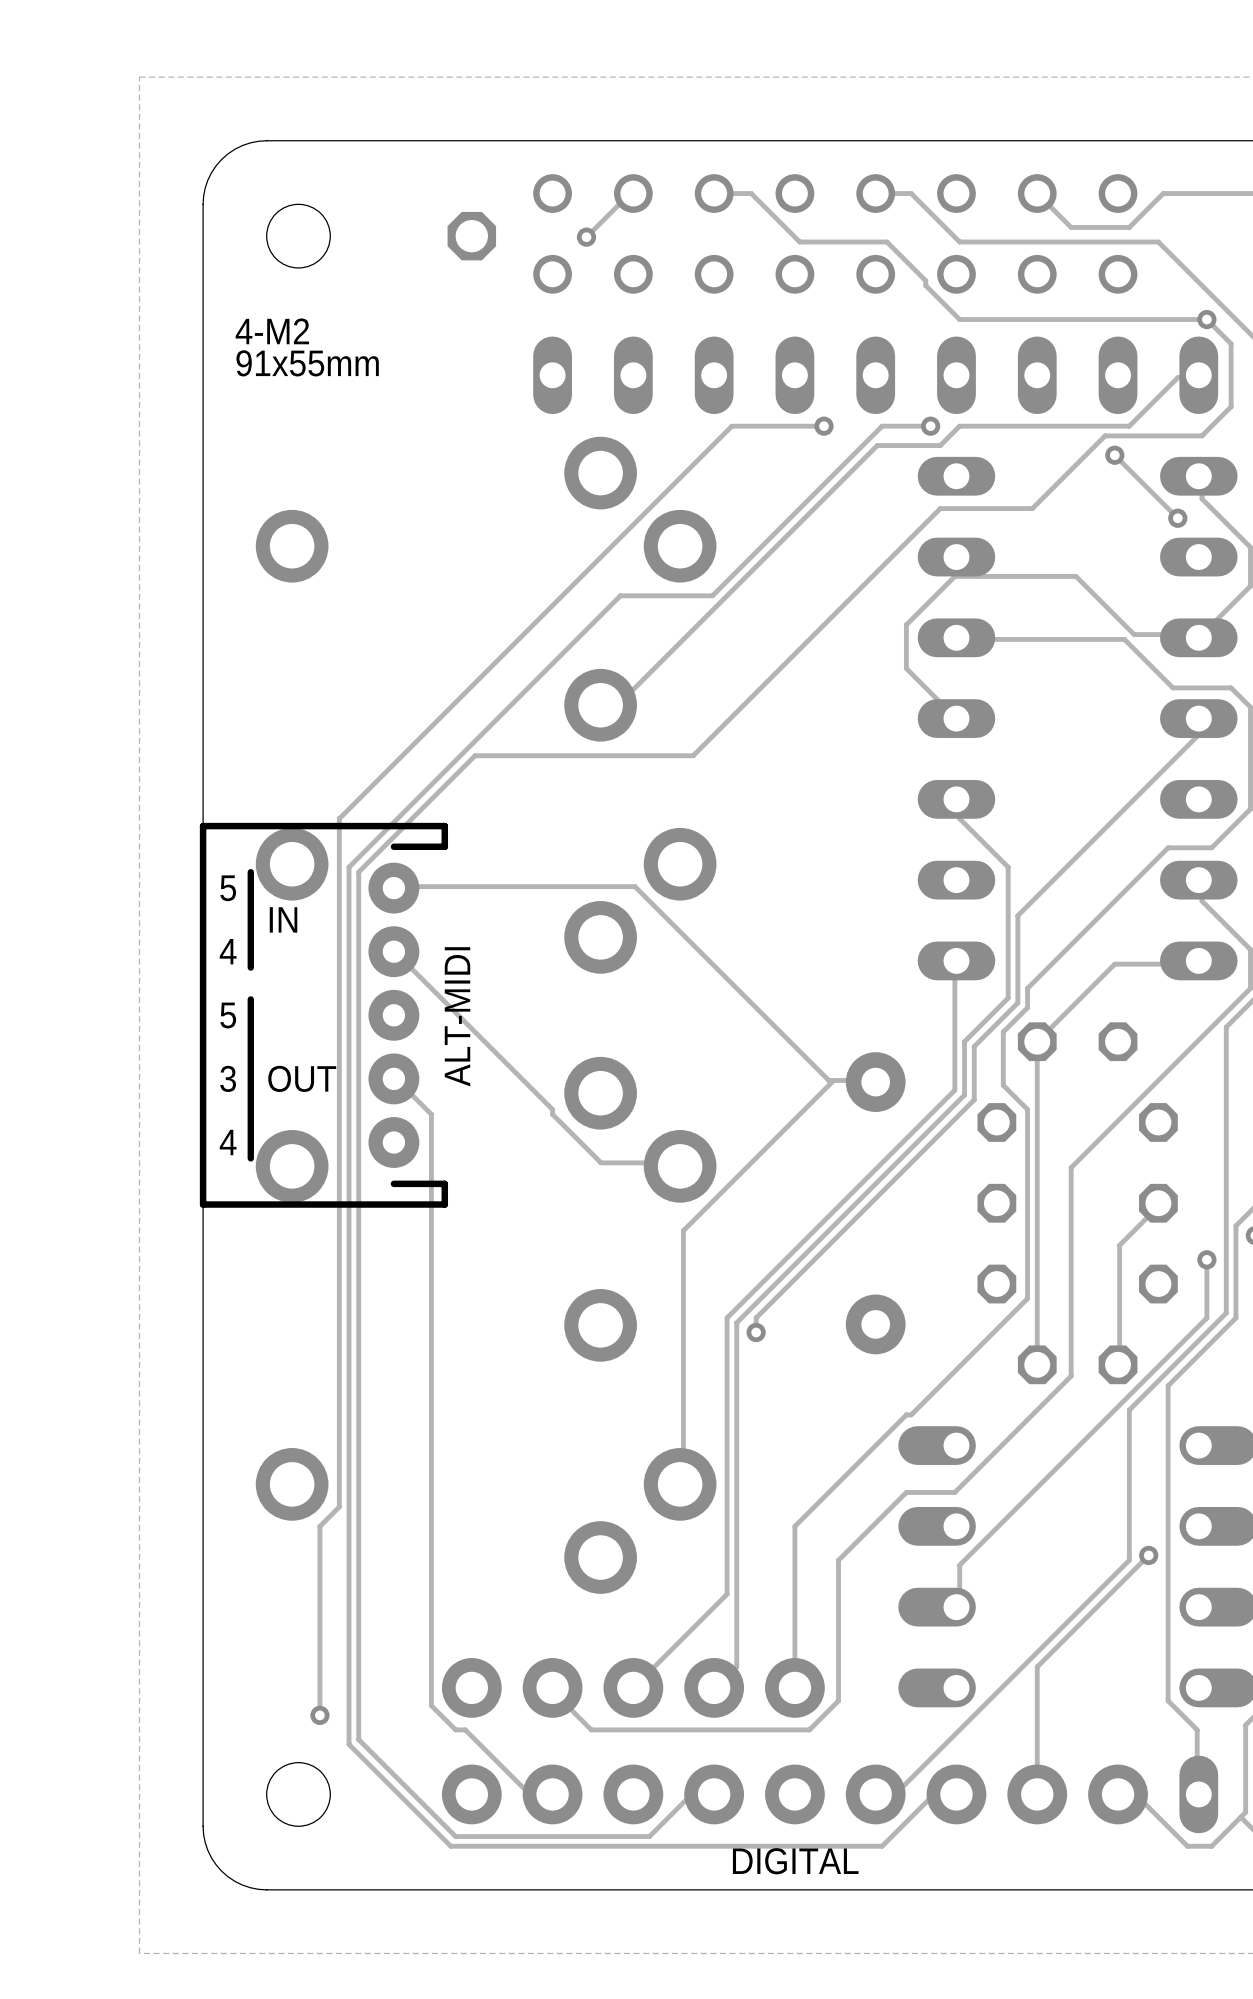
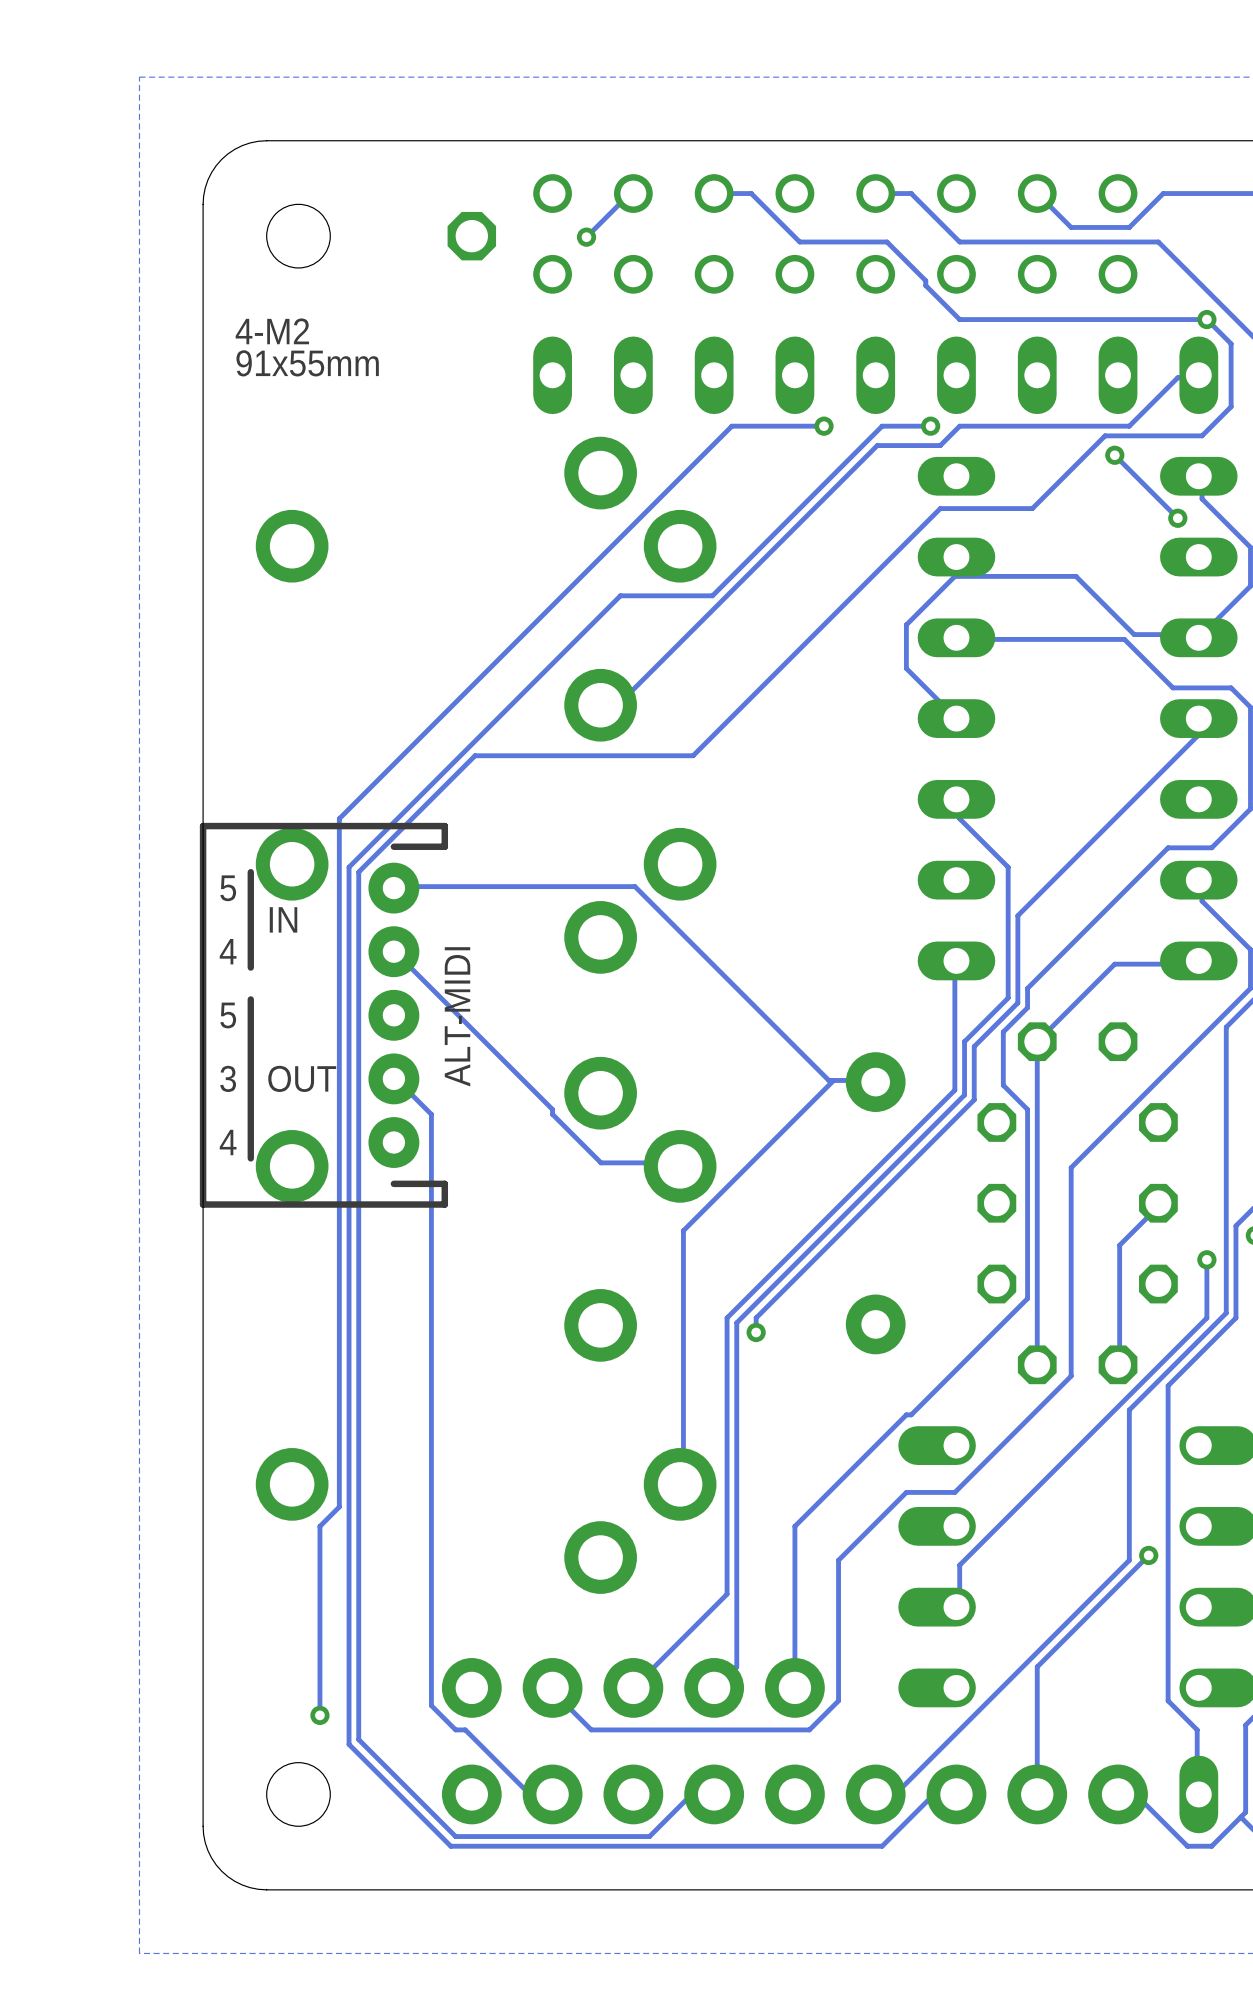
text: DIGITAL (795, 1861) -> none

